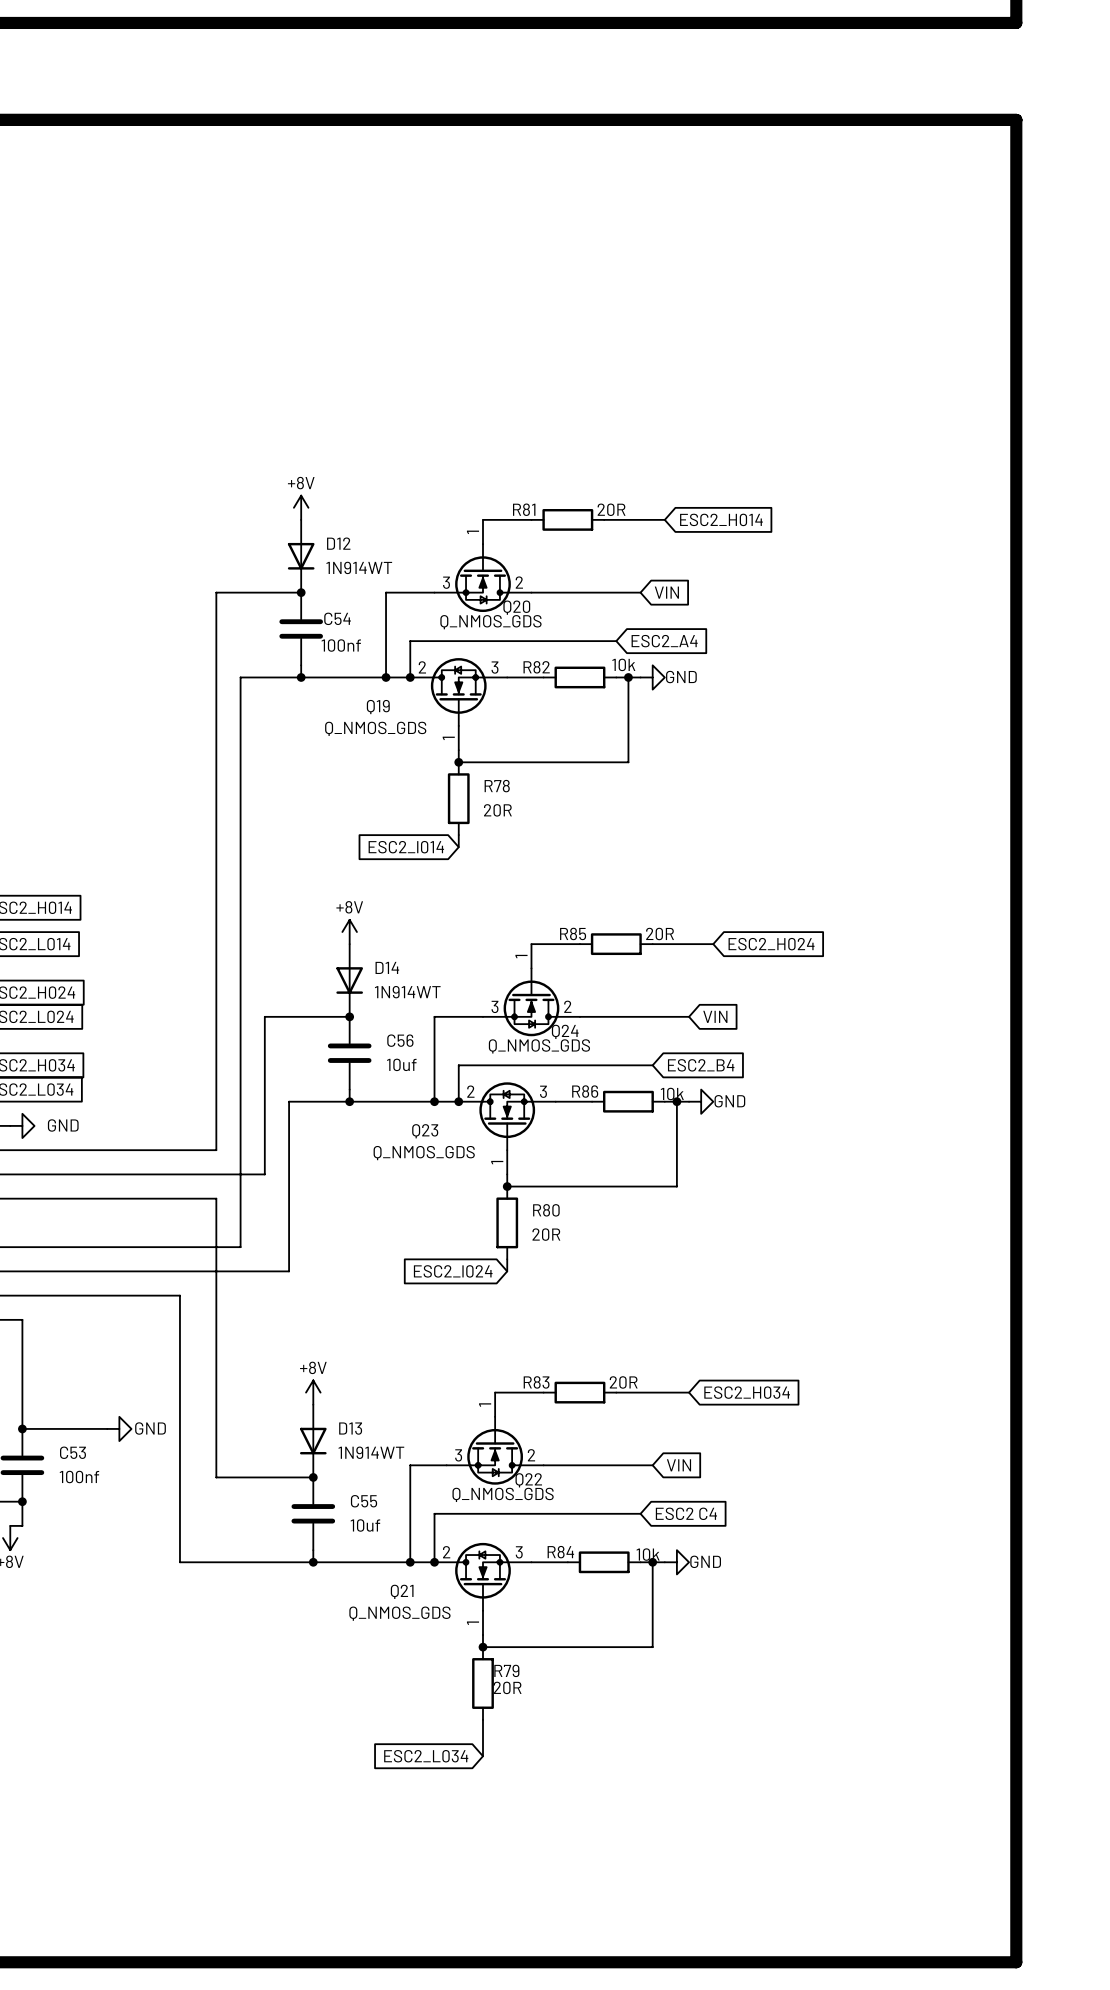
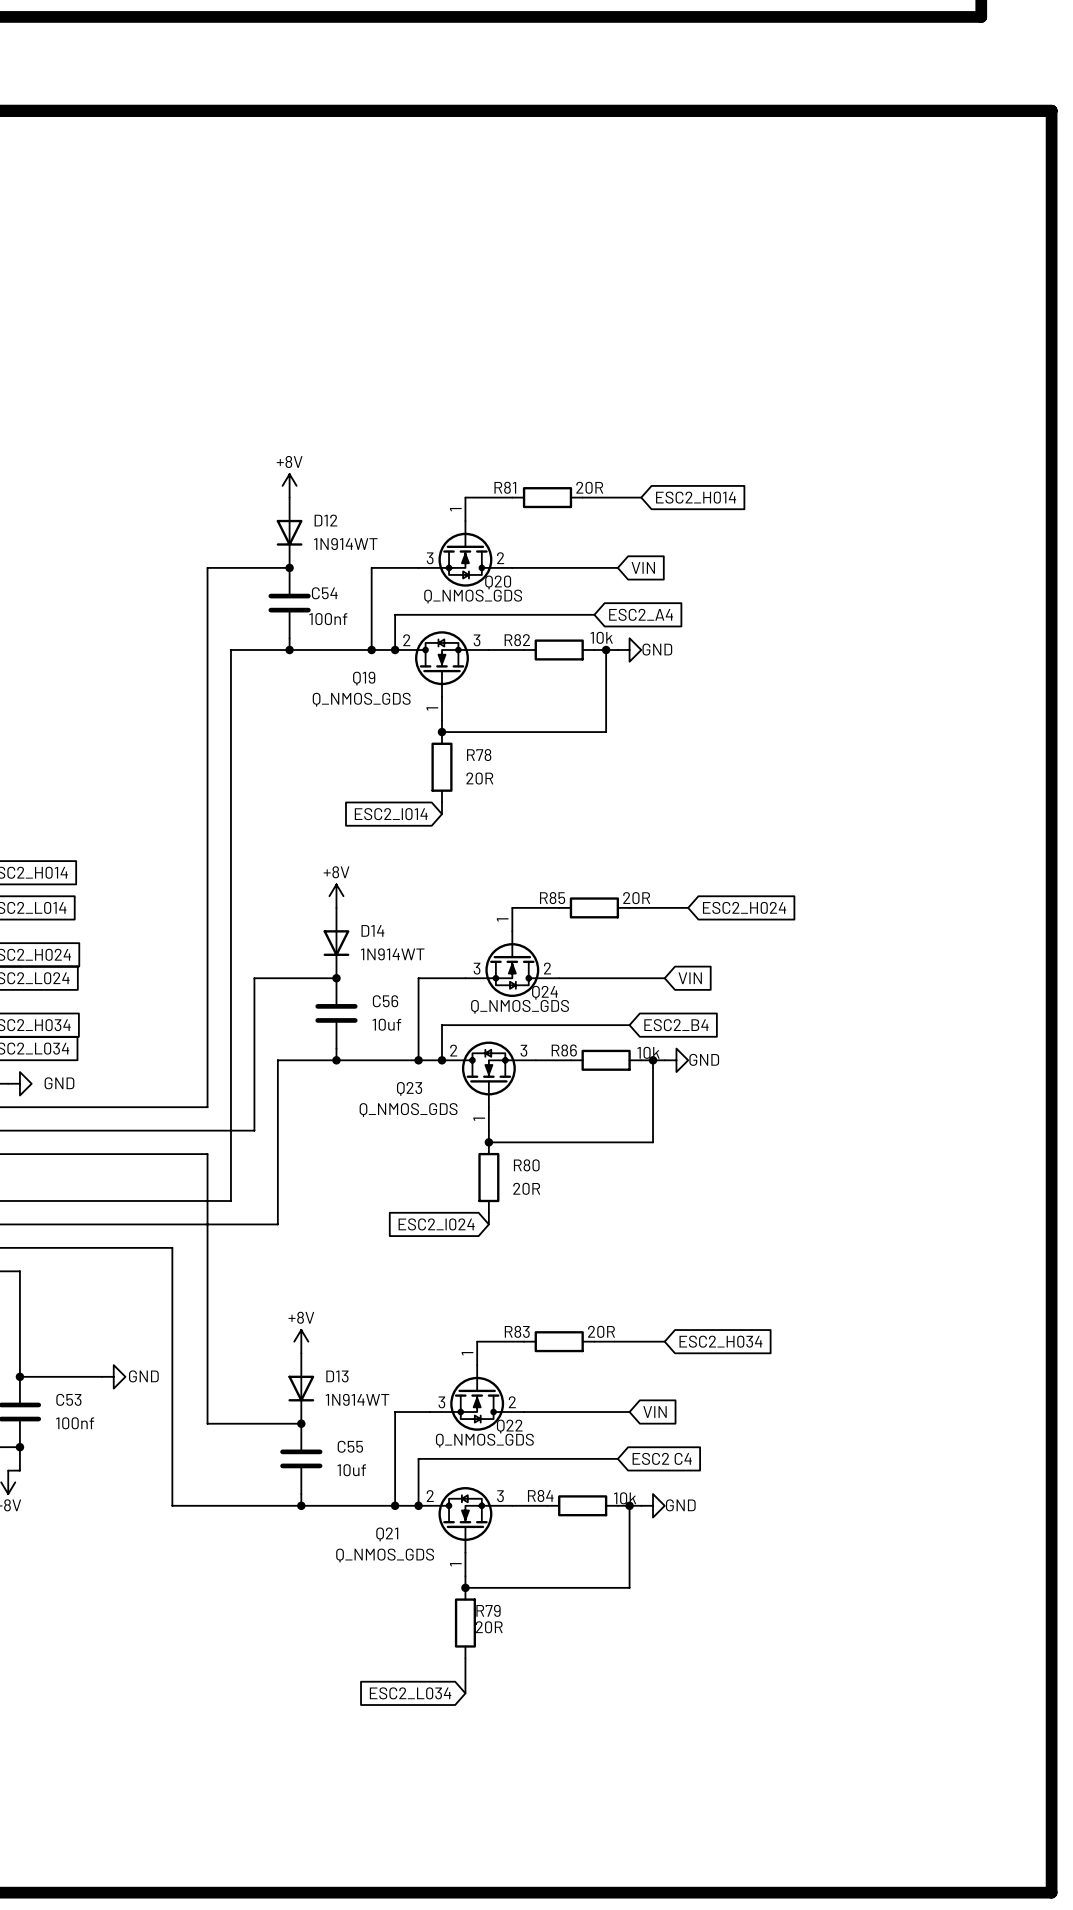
line: (1016, 119) (1016, 1962) -> (981, 110) (1051, 110) (1051, 1892) (981, 1892)

